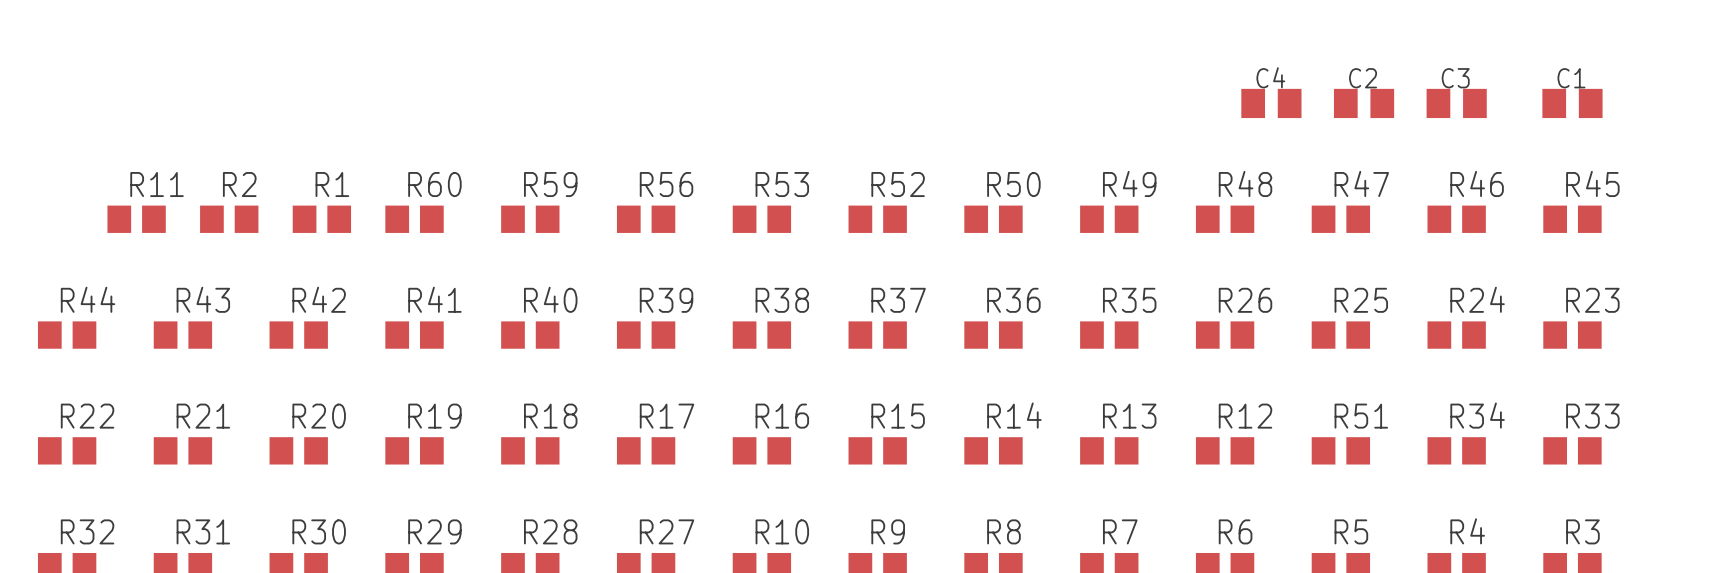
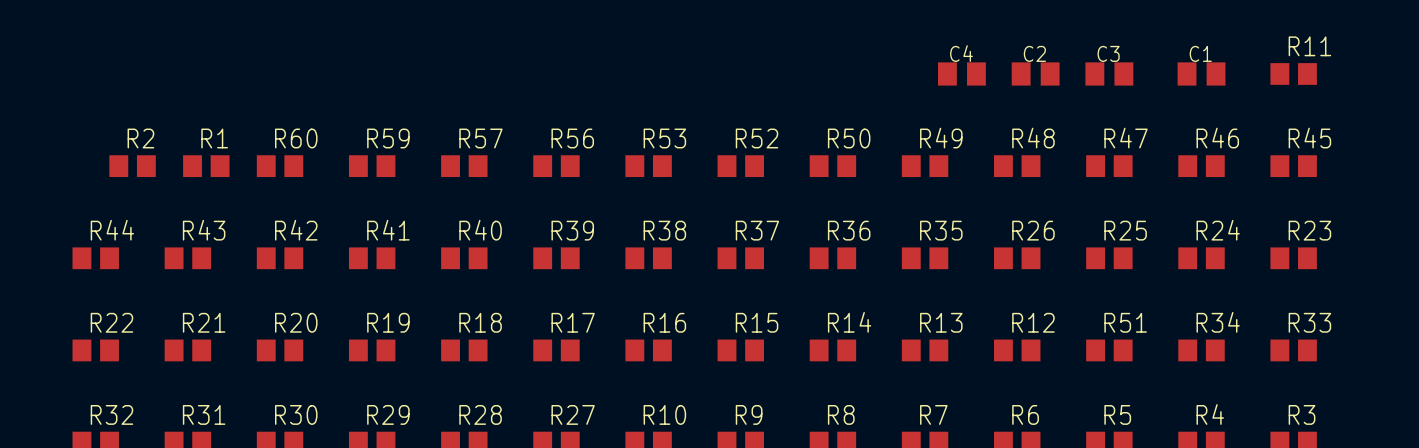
C3 name: C3 (1455, 78) -> C1 (1200, 53)
C4 position: (1271, 103) -> (961, 73)
C3: none -> (1109, 73)
C2 position: (1364, 103) -> (1035, 73)
C1: (1572, 103) -> none
R60 name: R60 (434, 184) -> R59 (388, 138)
R59 name: R59 (550, 184) -> R57 (480, 138)
R11 position: (136, 219) -> (1293, 73)
R2 position: (229, 219) -> (132, 166)
R60: none -> (280, 166)
R1 position: (321, 219) -> (206, 166)

